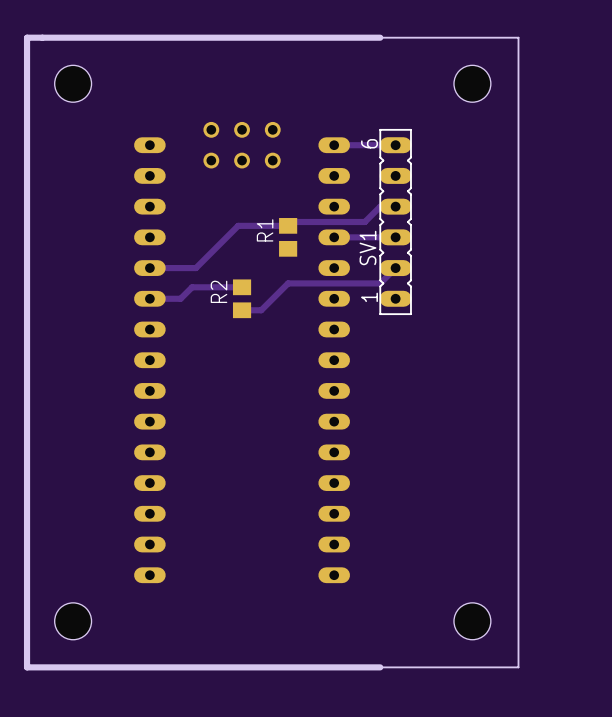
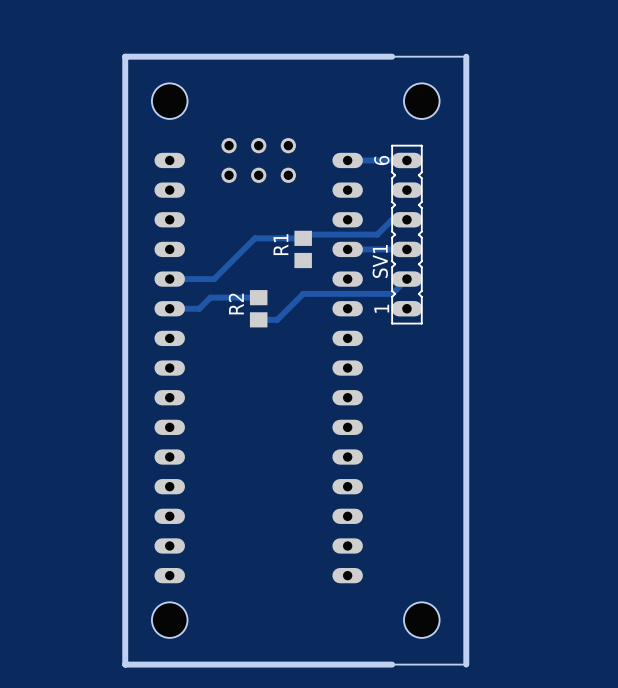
board edge: (103, 37) (27, 37) (27, 667) -> (125, 56) (125, 664)
board edge: (457, 37) (518, 37) (518, 667) (457, 667) -> (466, 56) (466, 664)
hole position: (73, 83) -> (169, 101)
hole position: (472, 83) -> (421, 101)
hole position: (73, 621) -> (169, 620)
hole position: (472, 621) -> (421, 620)
board edge: (27, 667) (103, 667) -> none

